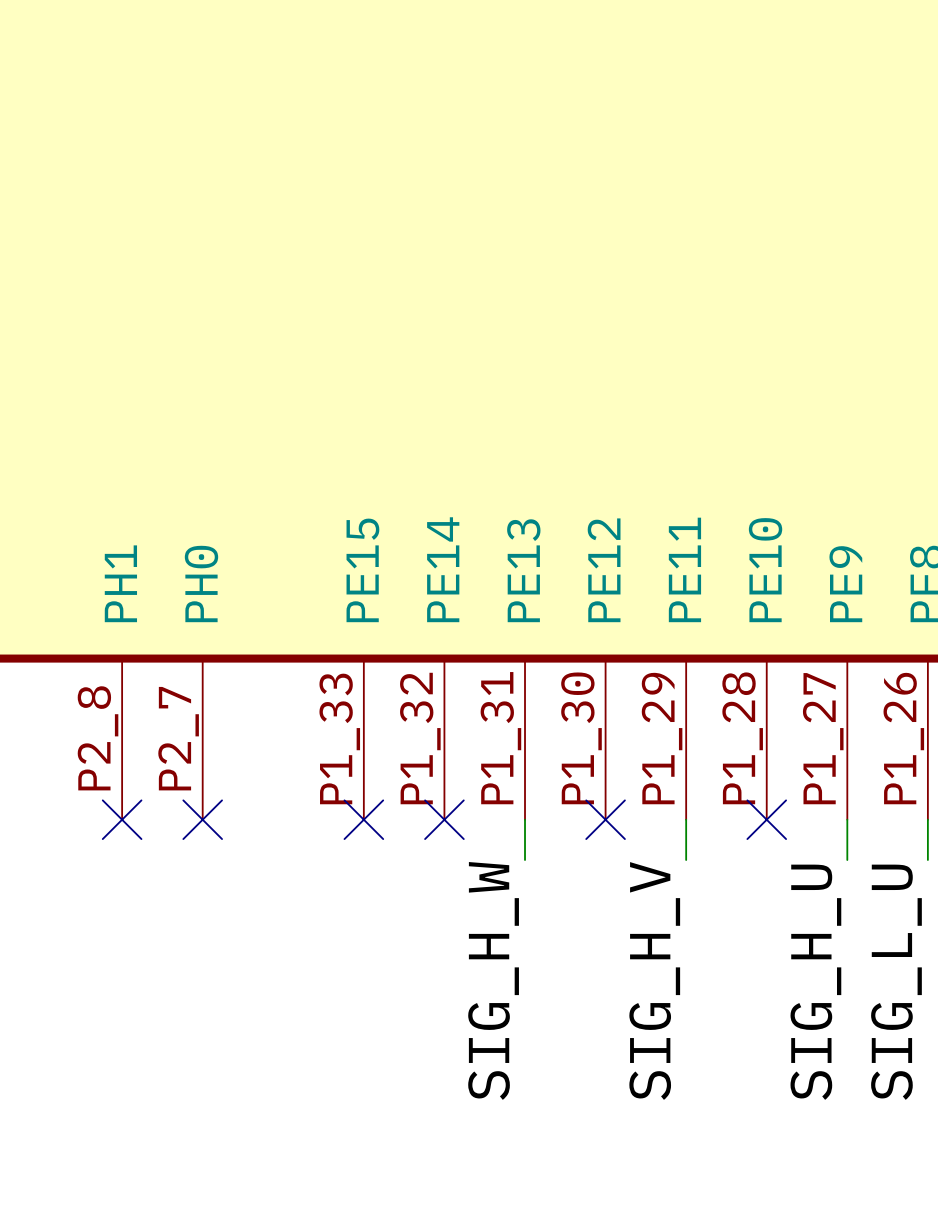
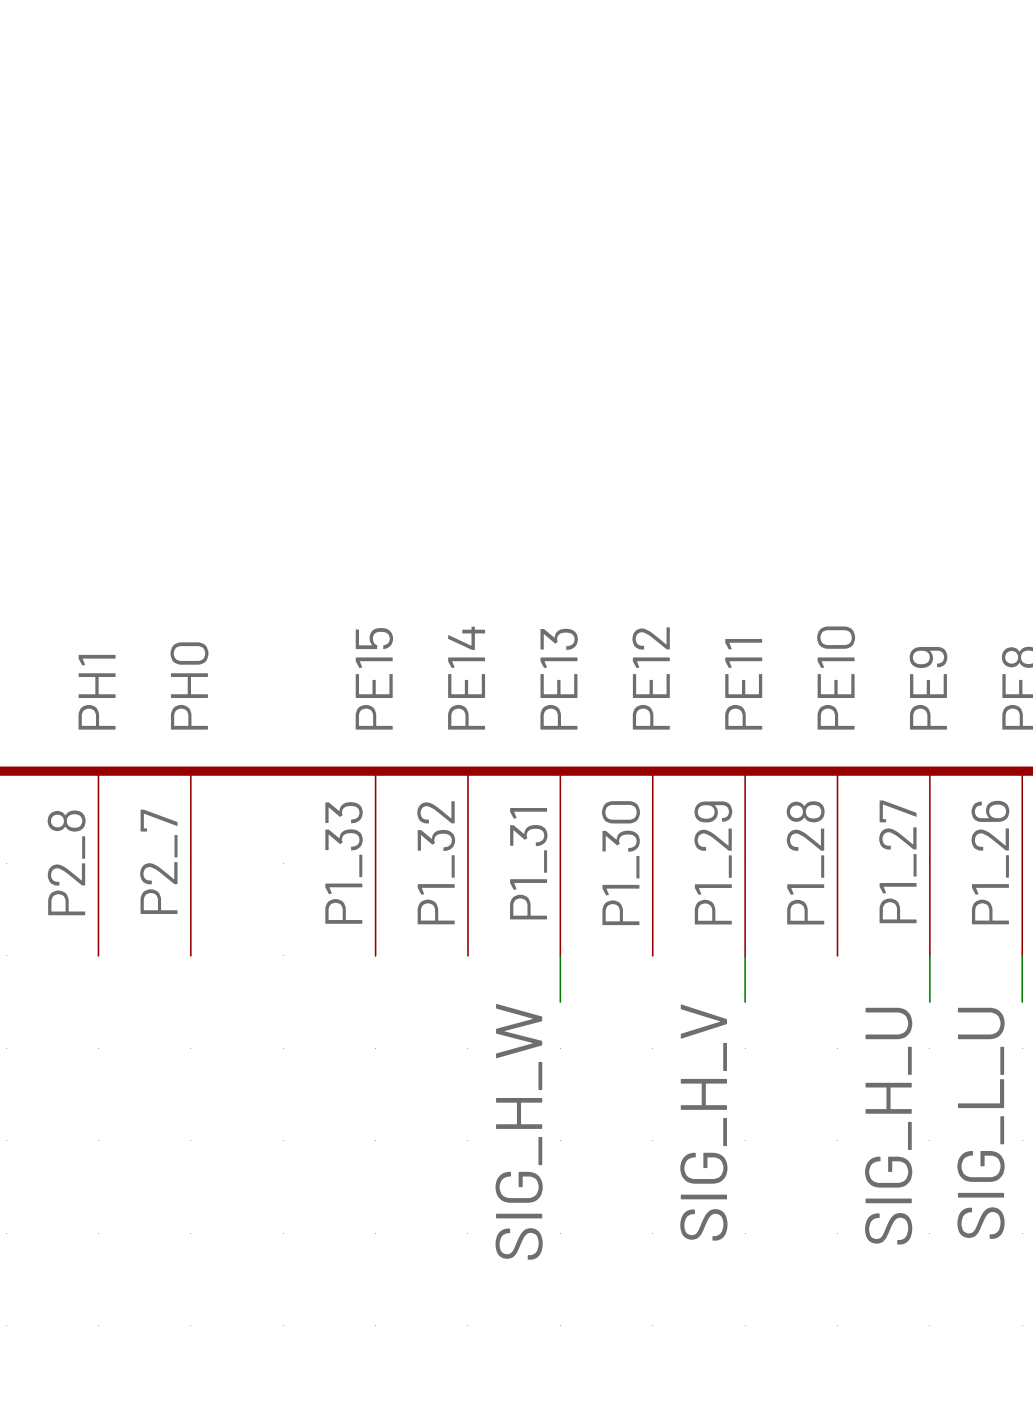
no-connect mark: (122, 819) -> none
no-connect mark: (202, 819) -> none
no-connect mark: (363, 819) -> none
no-connect mark: (444, 819) -> none
no-connect mark: (605, 819) -> none
no-connect mark: (766, 819) -> none

